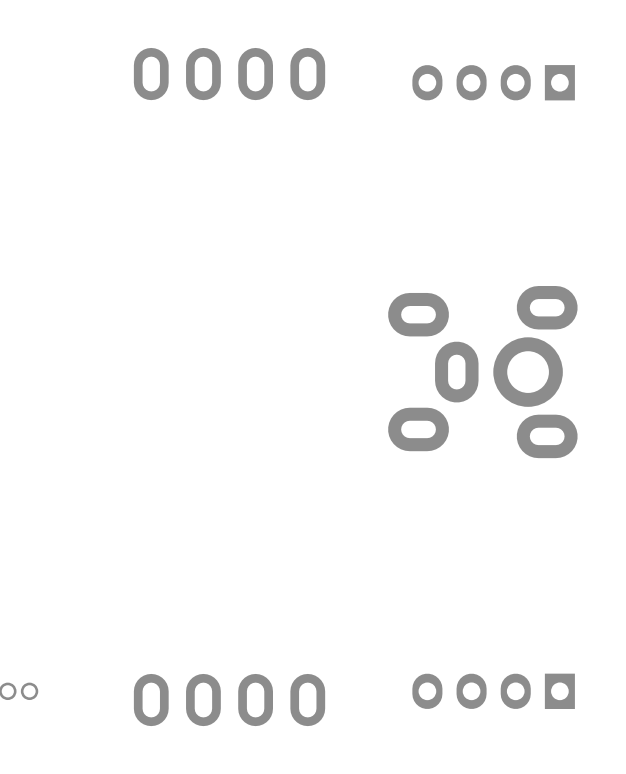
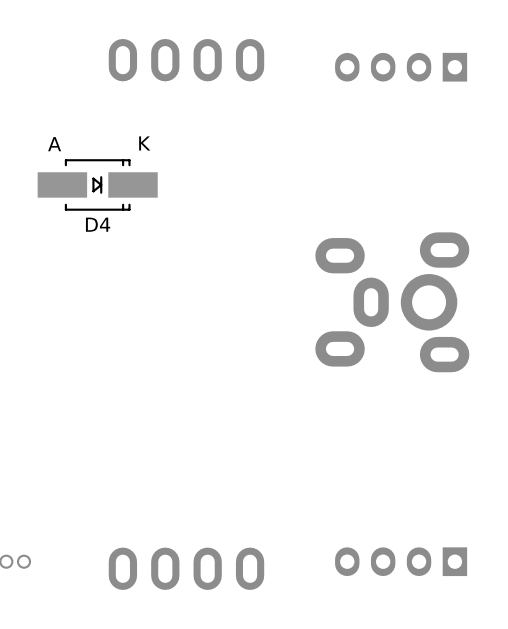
D4: none -> (97, 184)

